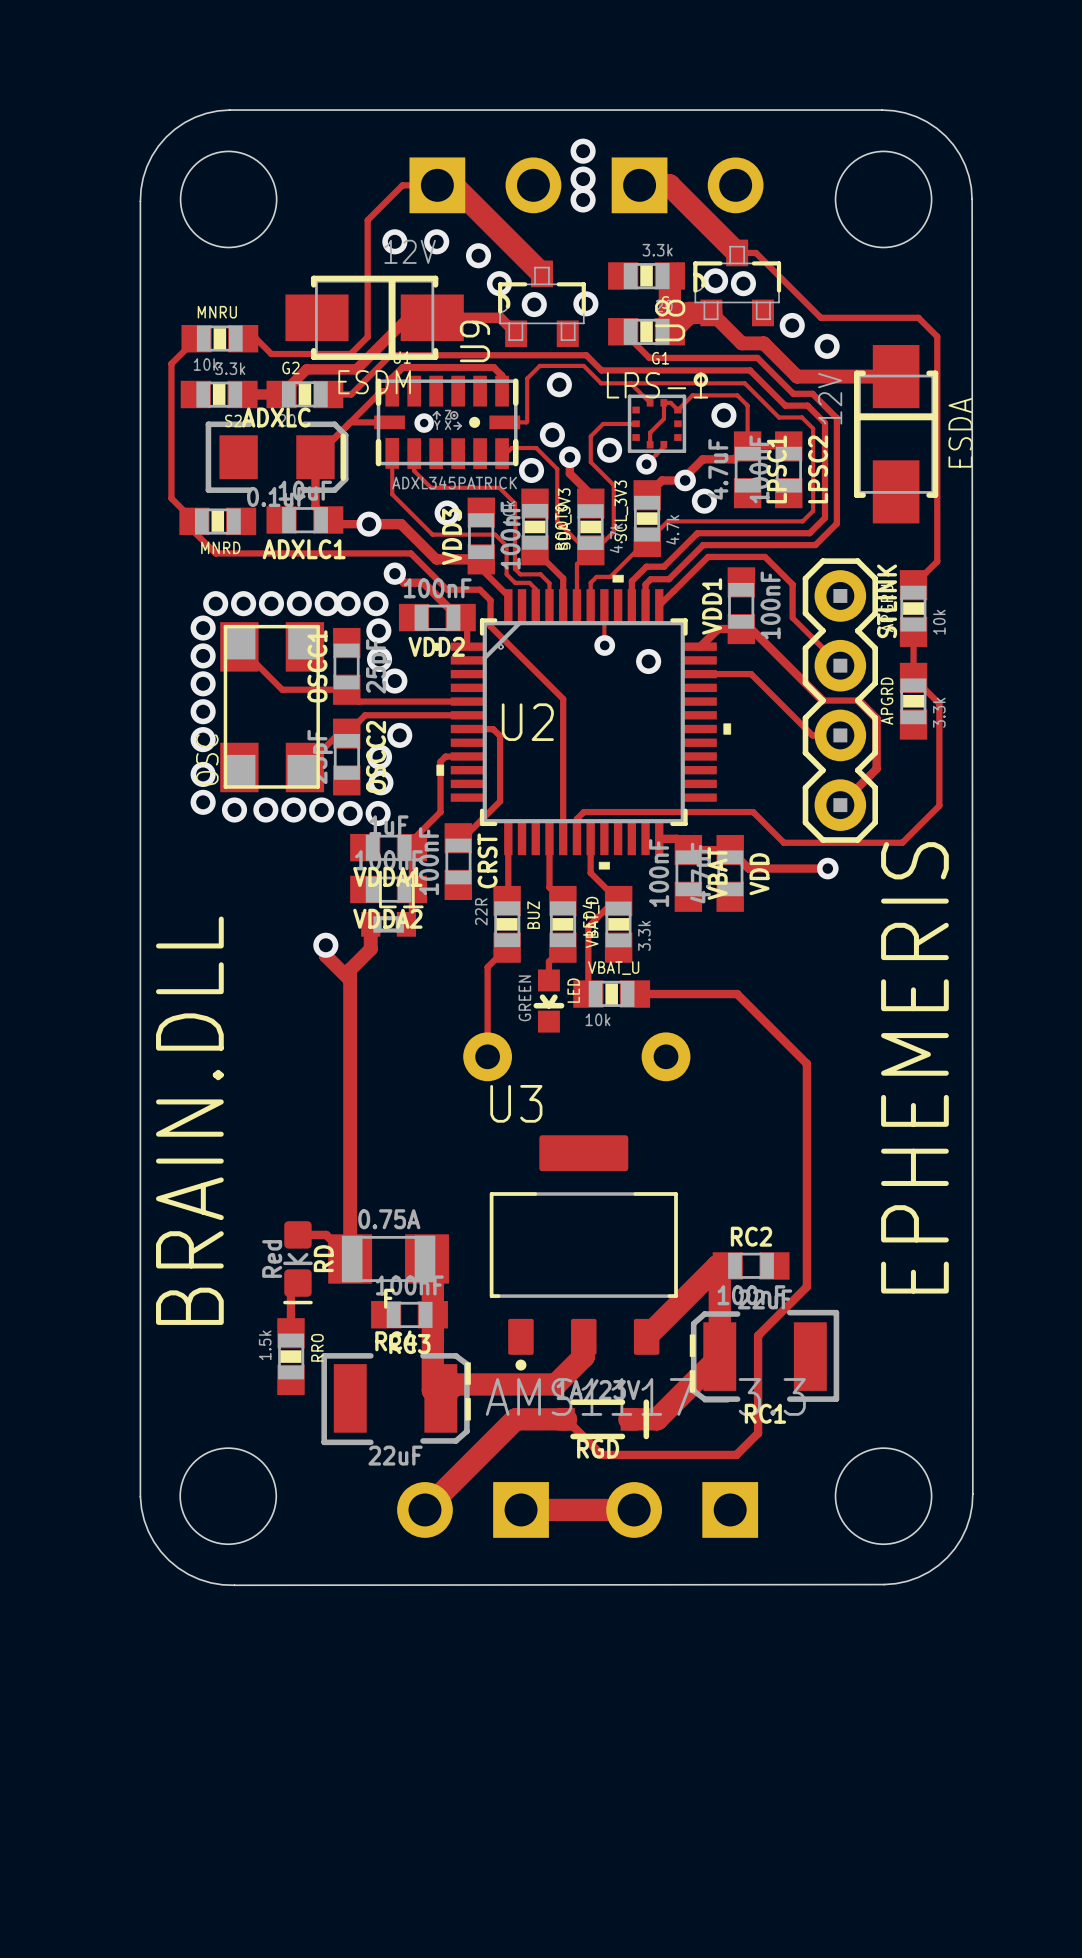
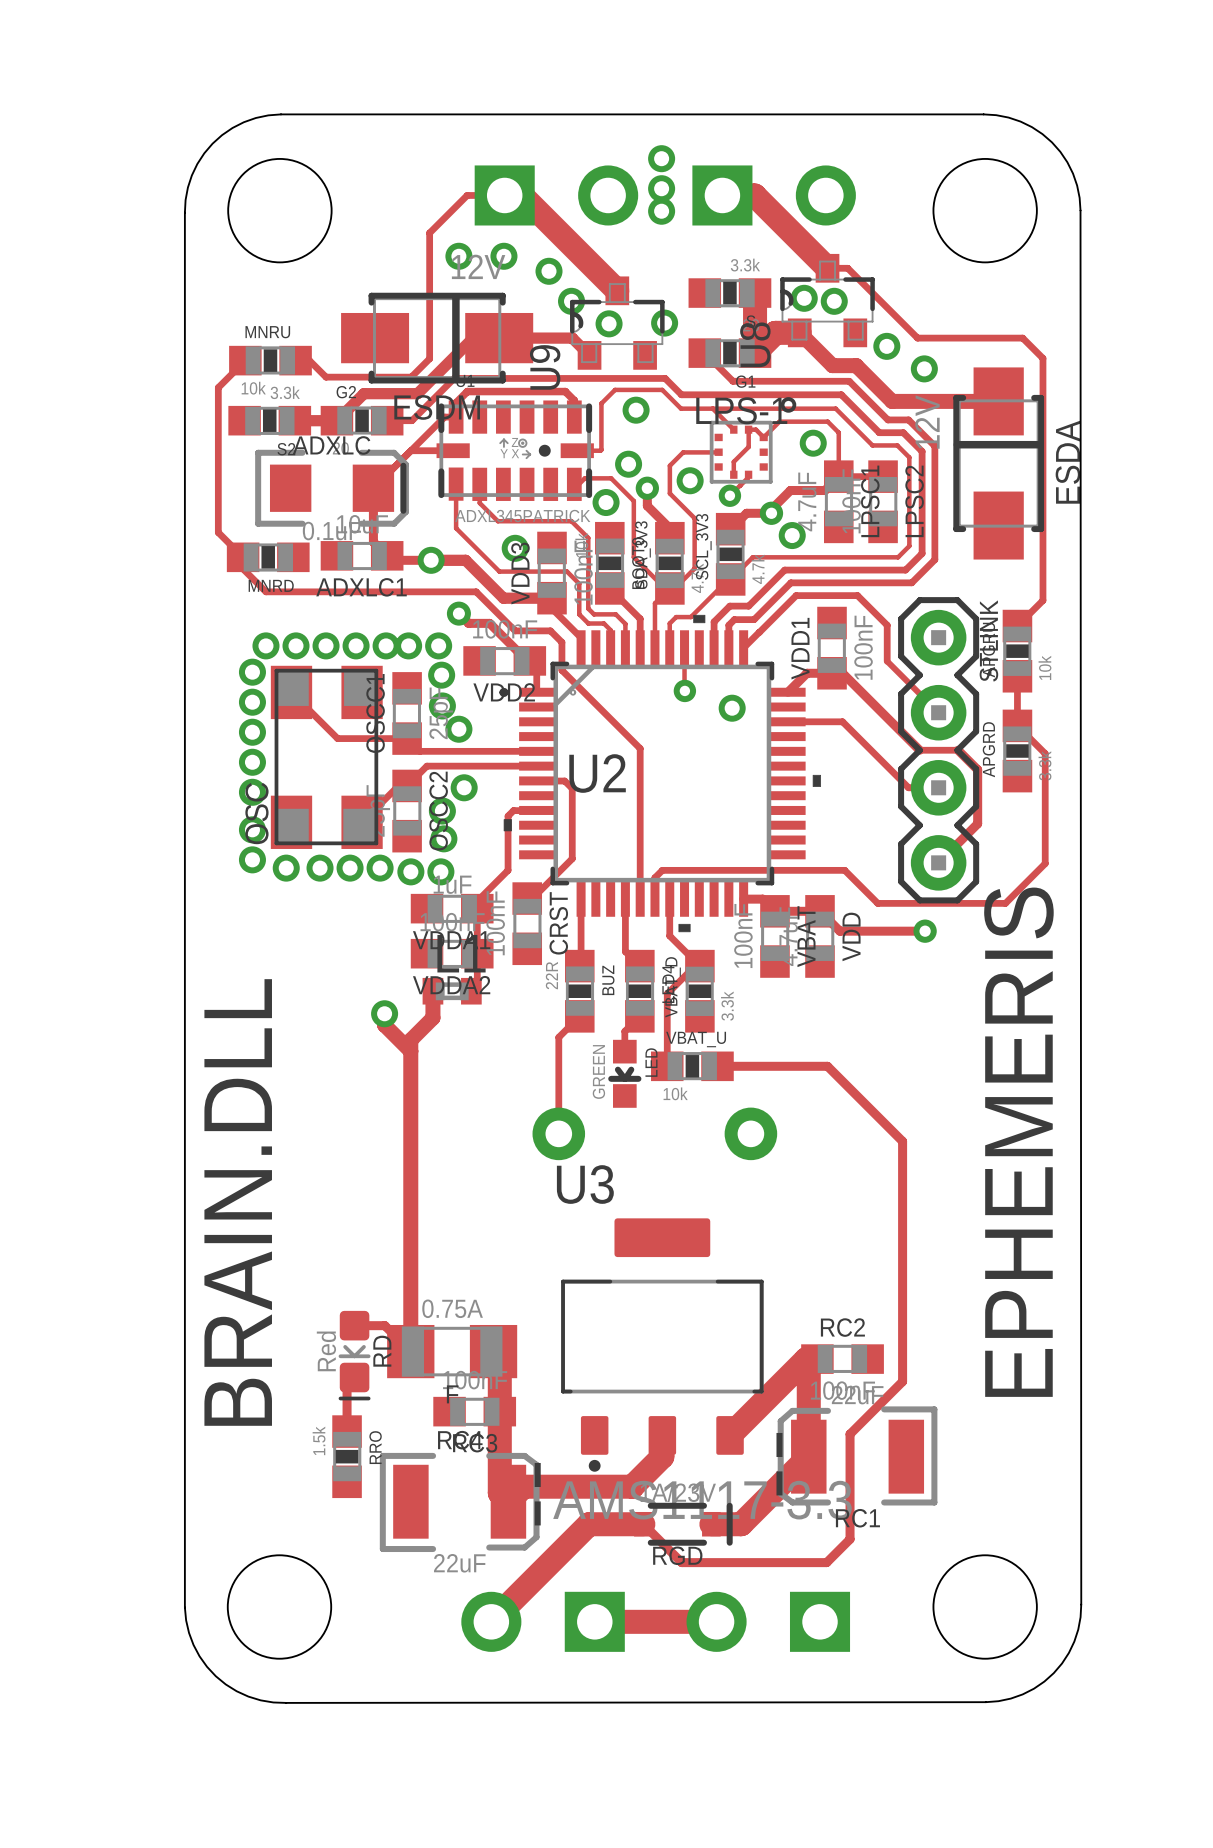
via: (424, 423) -> none

